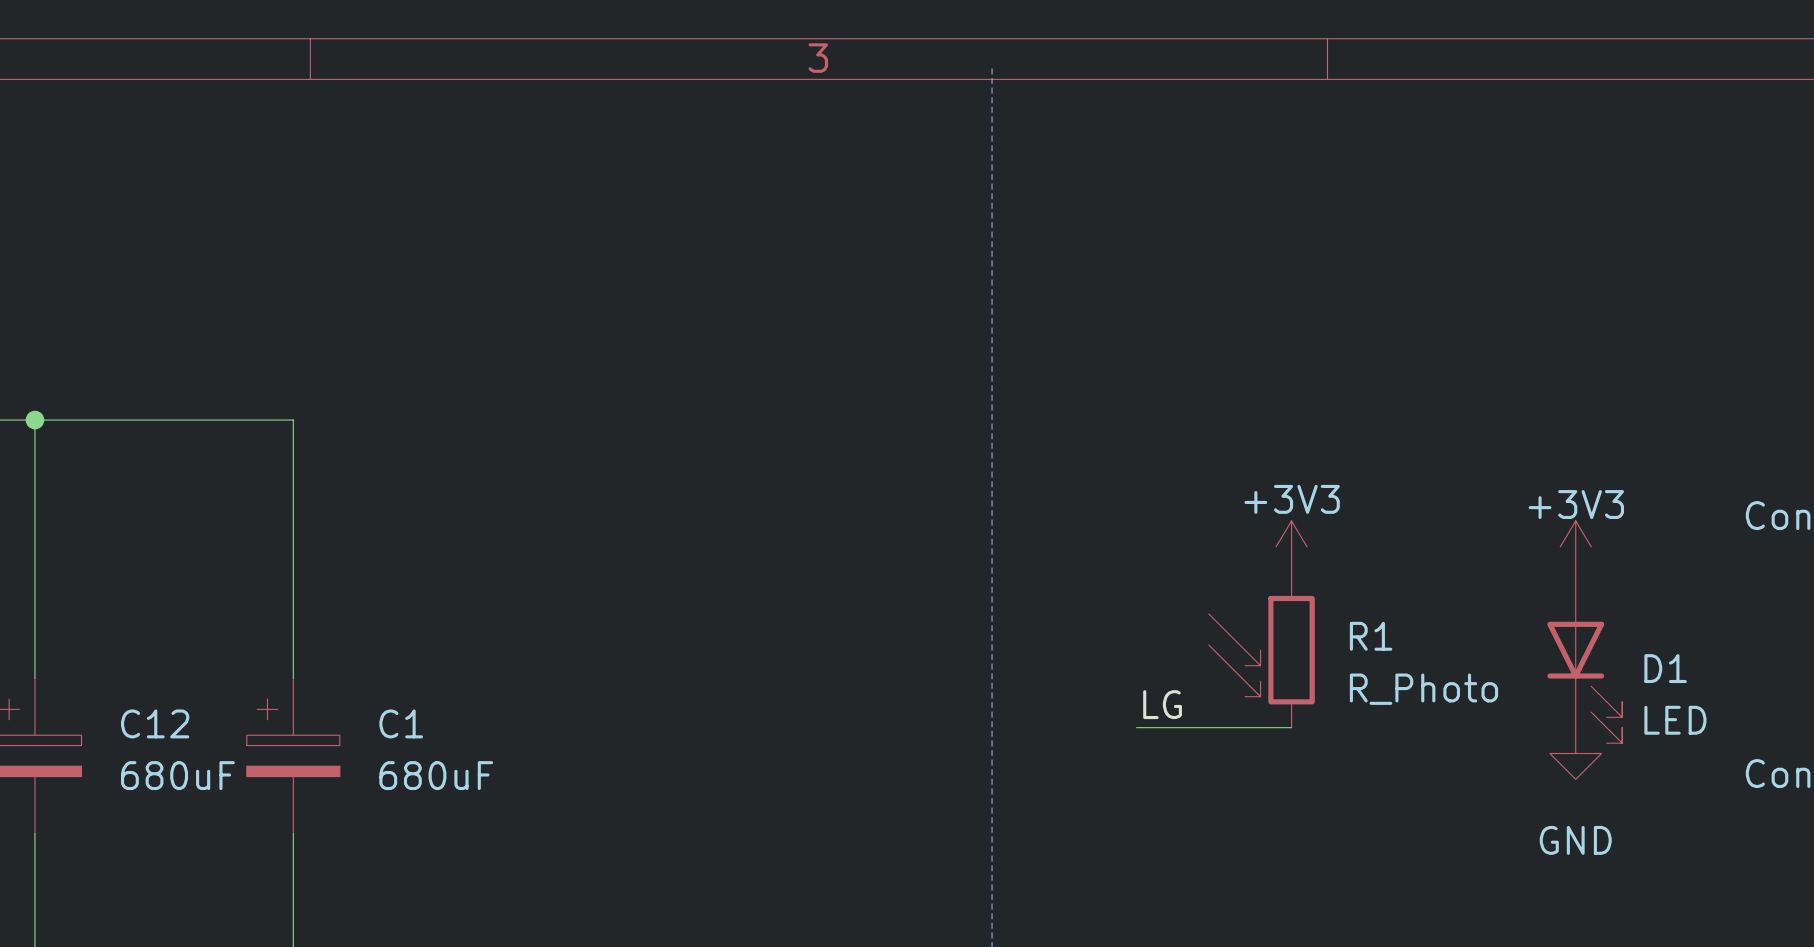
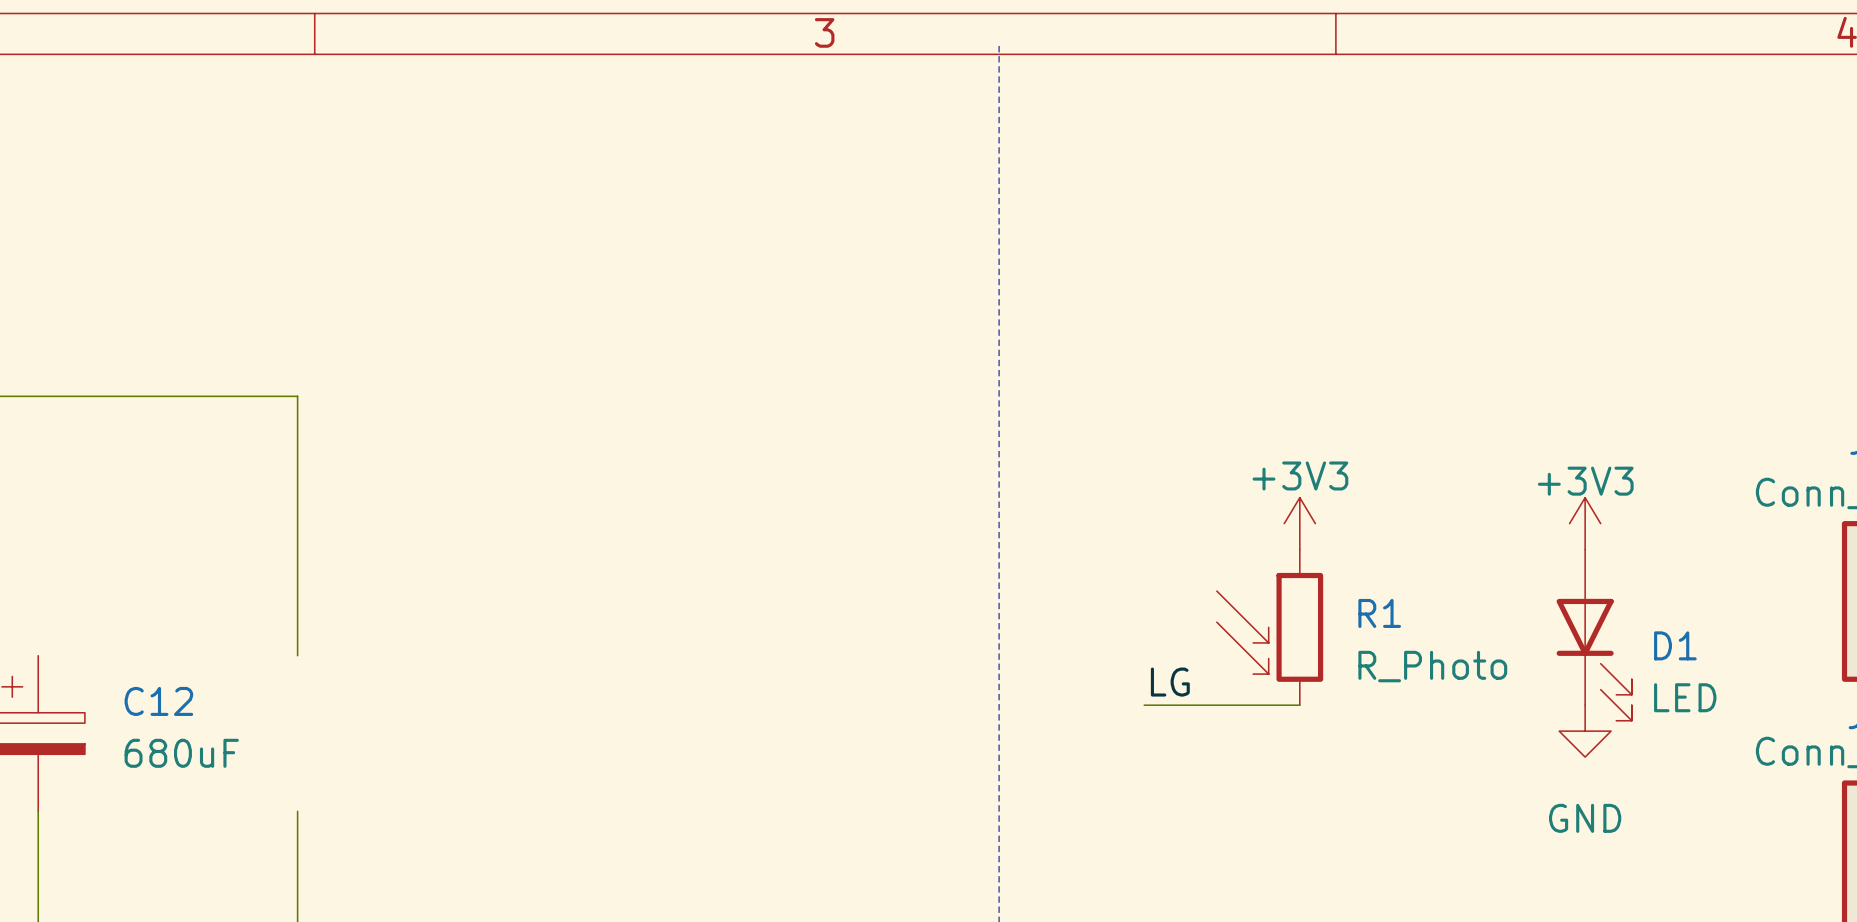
wire: (34, 420) (34, 678) -> none
junction: (34, 420) -> none
C1: 680uF (293, 755) -> none

